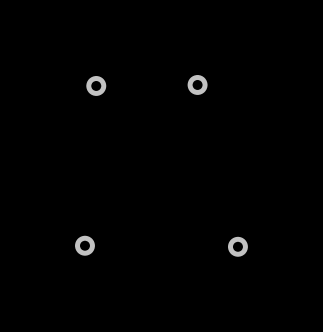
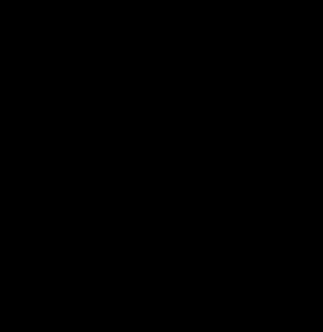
via: (197, 84) -> none
via: (96, 85) -> none
via: (84, 245) -> none
via: (237, 246) -> none

